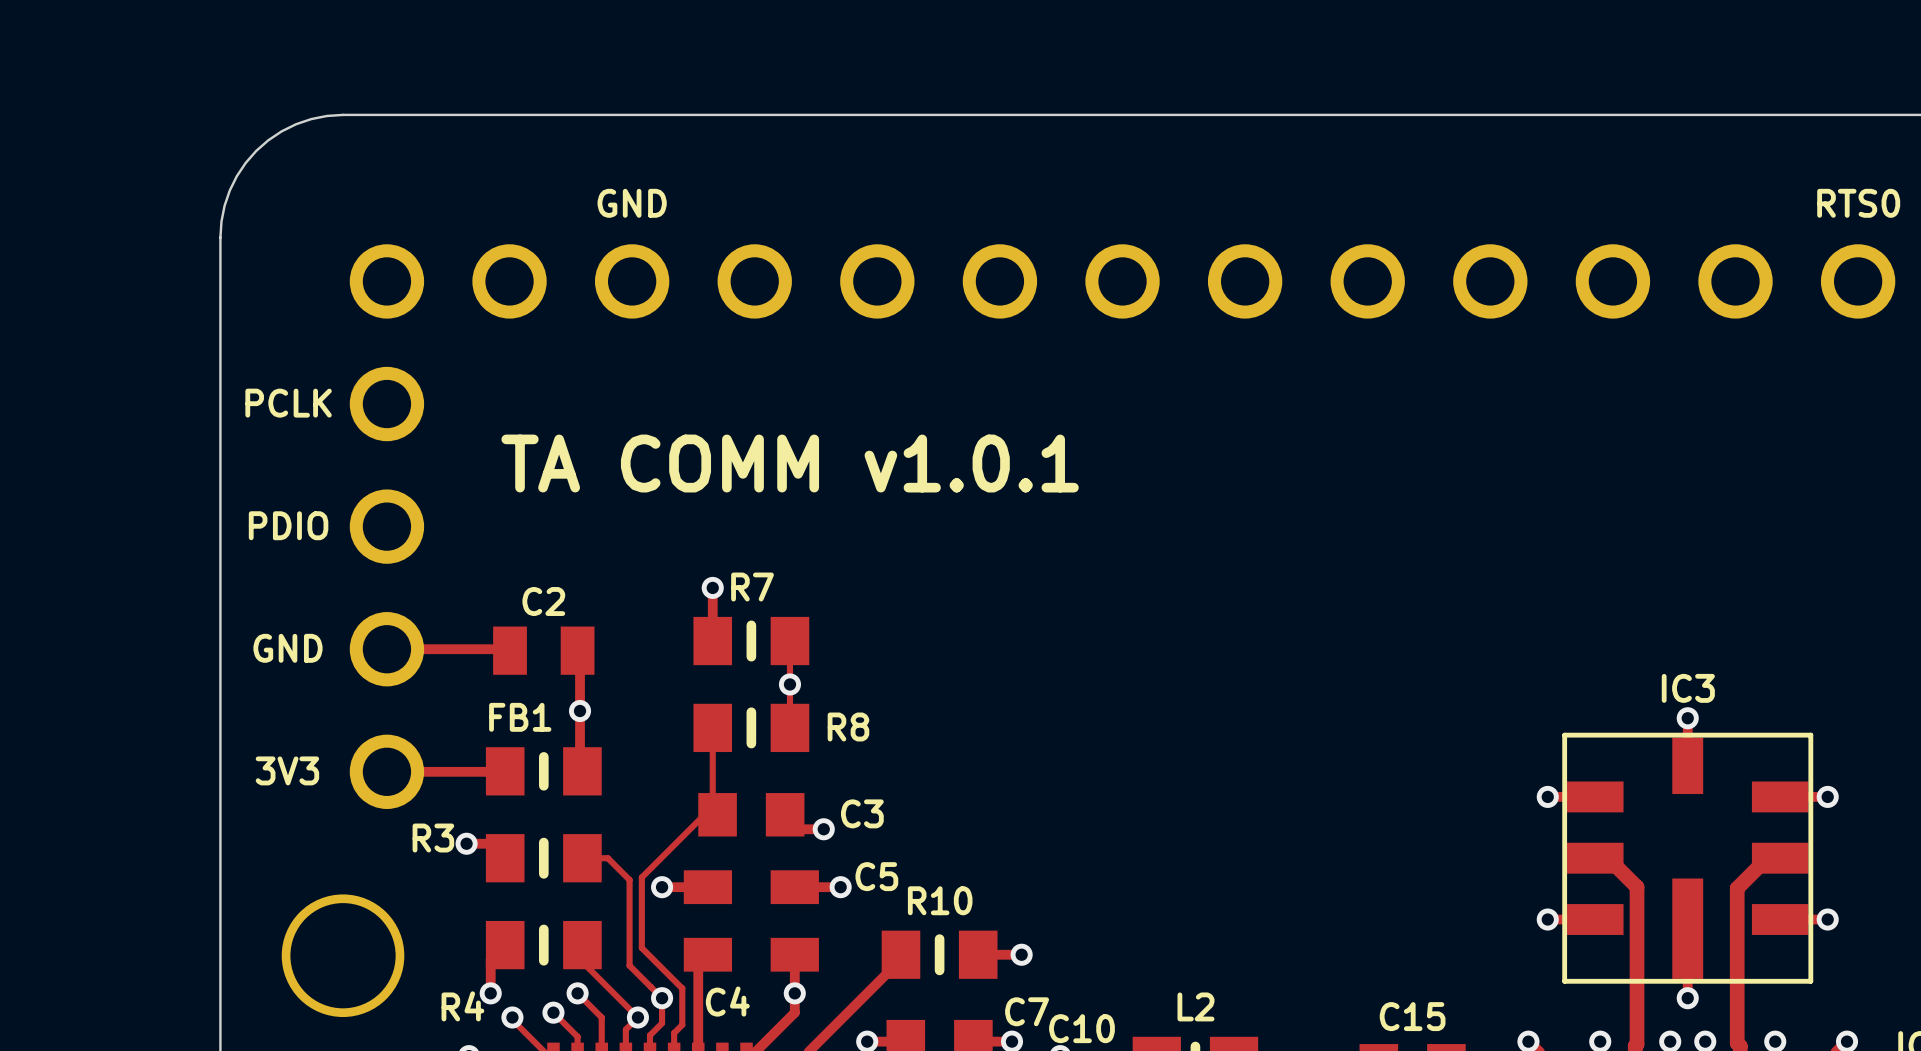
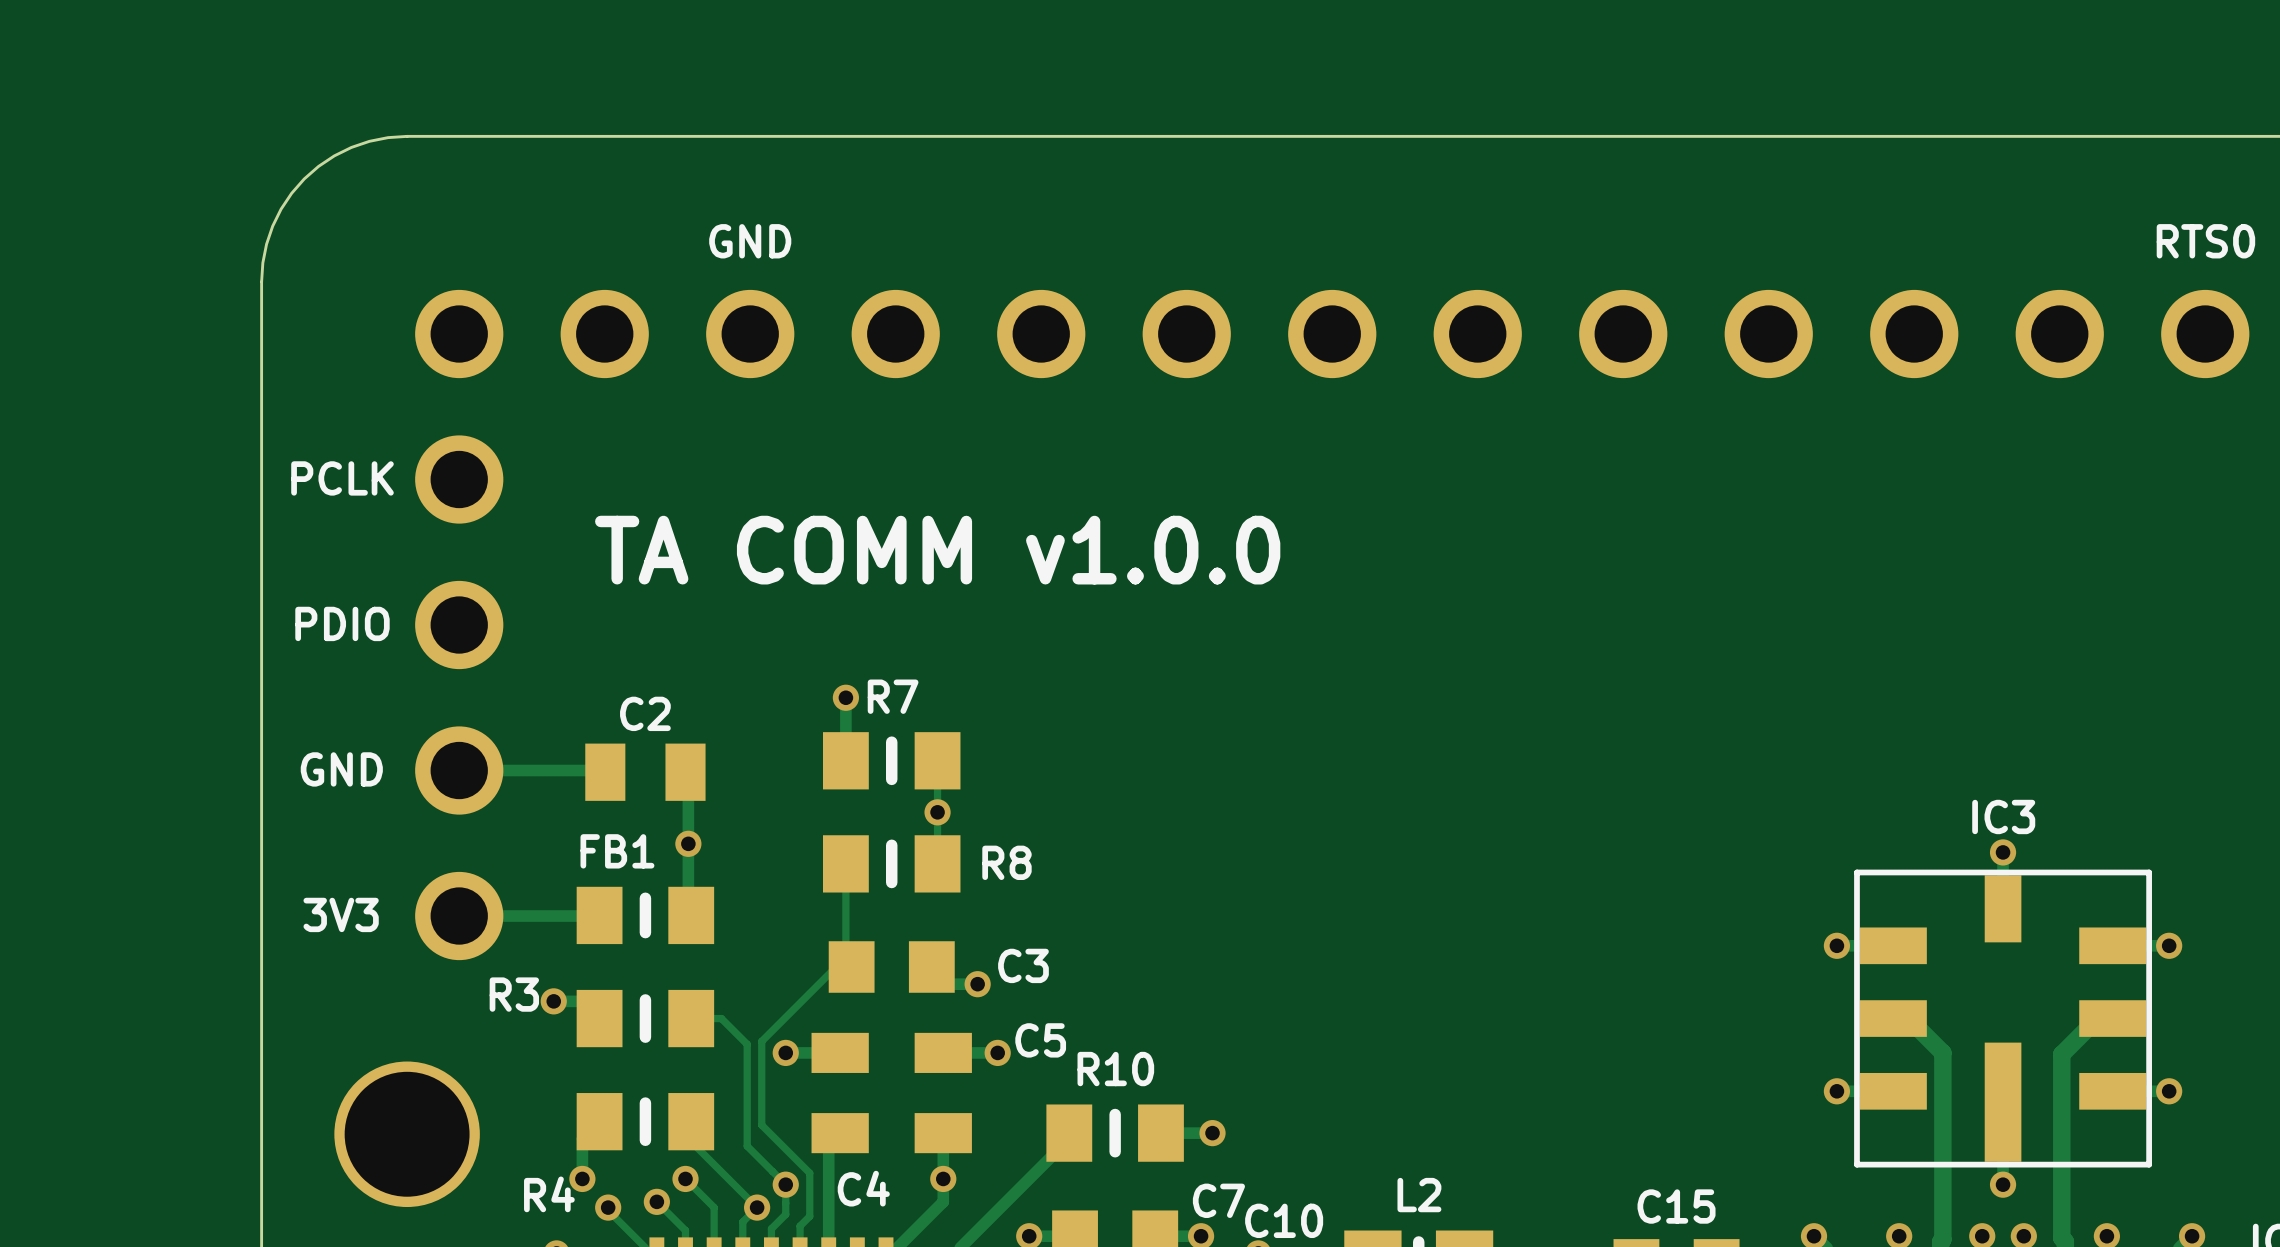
text: TA COMM v1.0.1 (790, 463) -> TA COMM v1.0.0 (937, 550)

